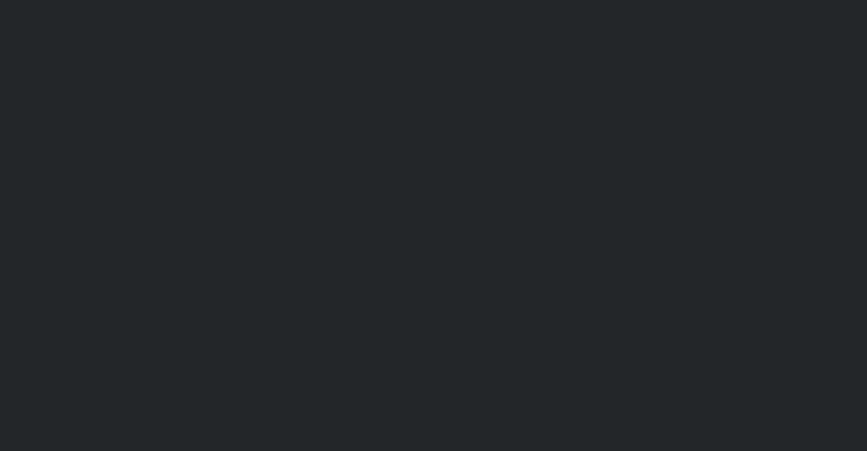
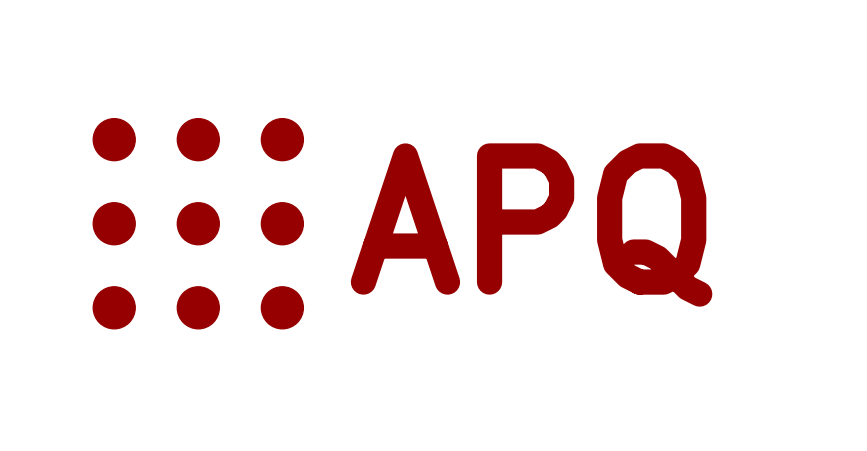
part: none -> (198, 223)

